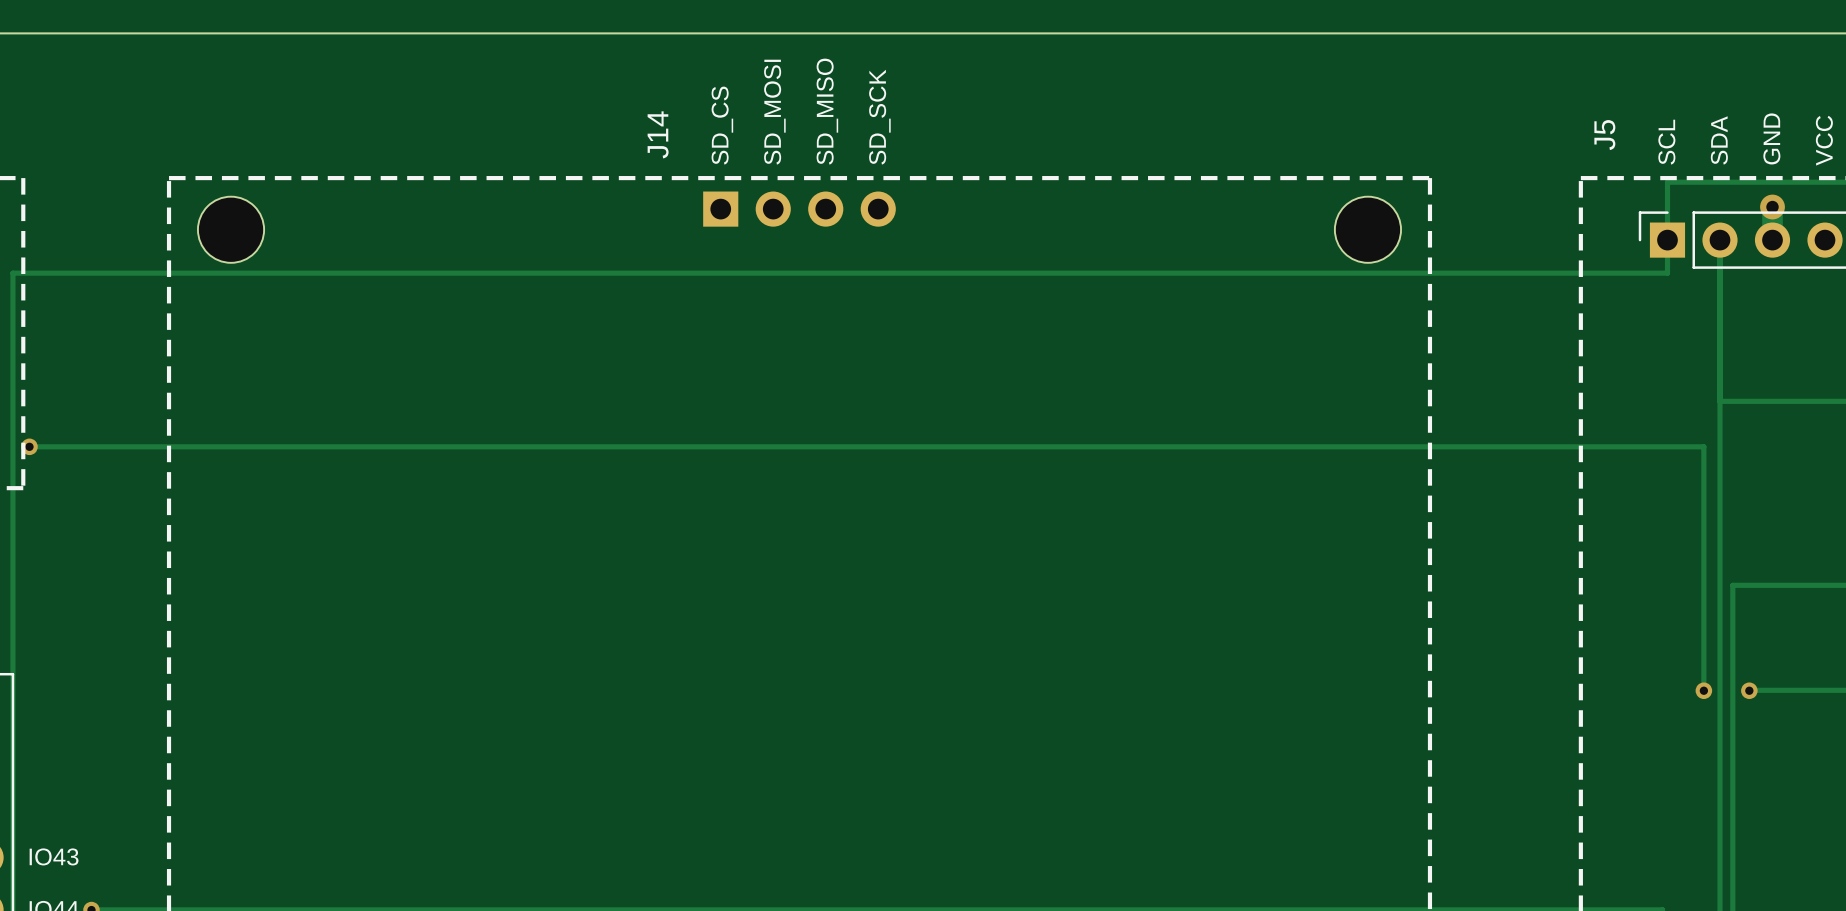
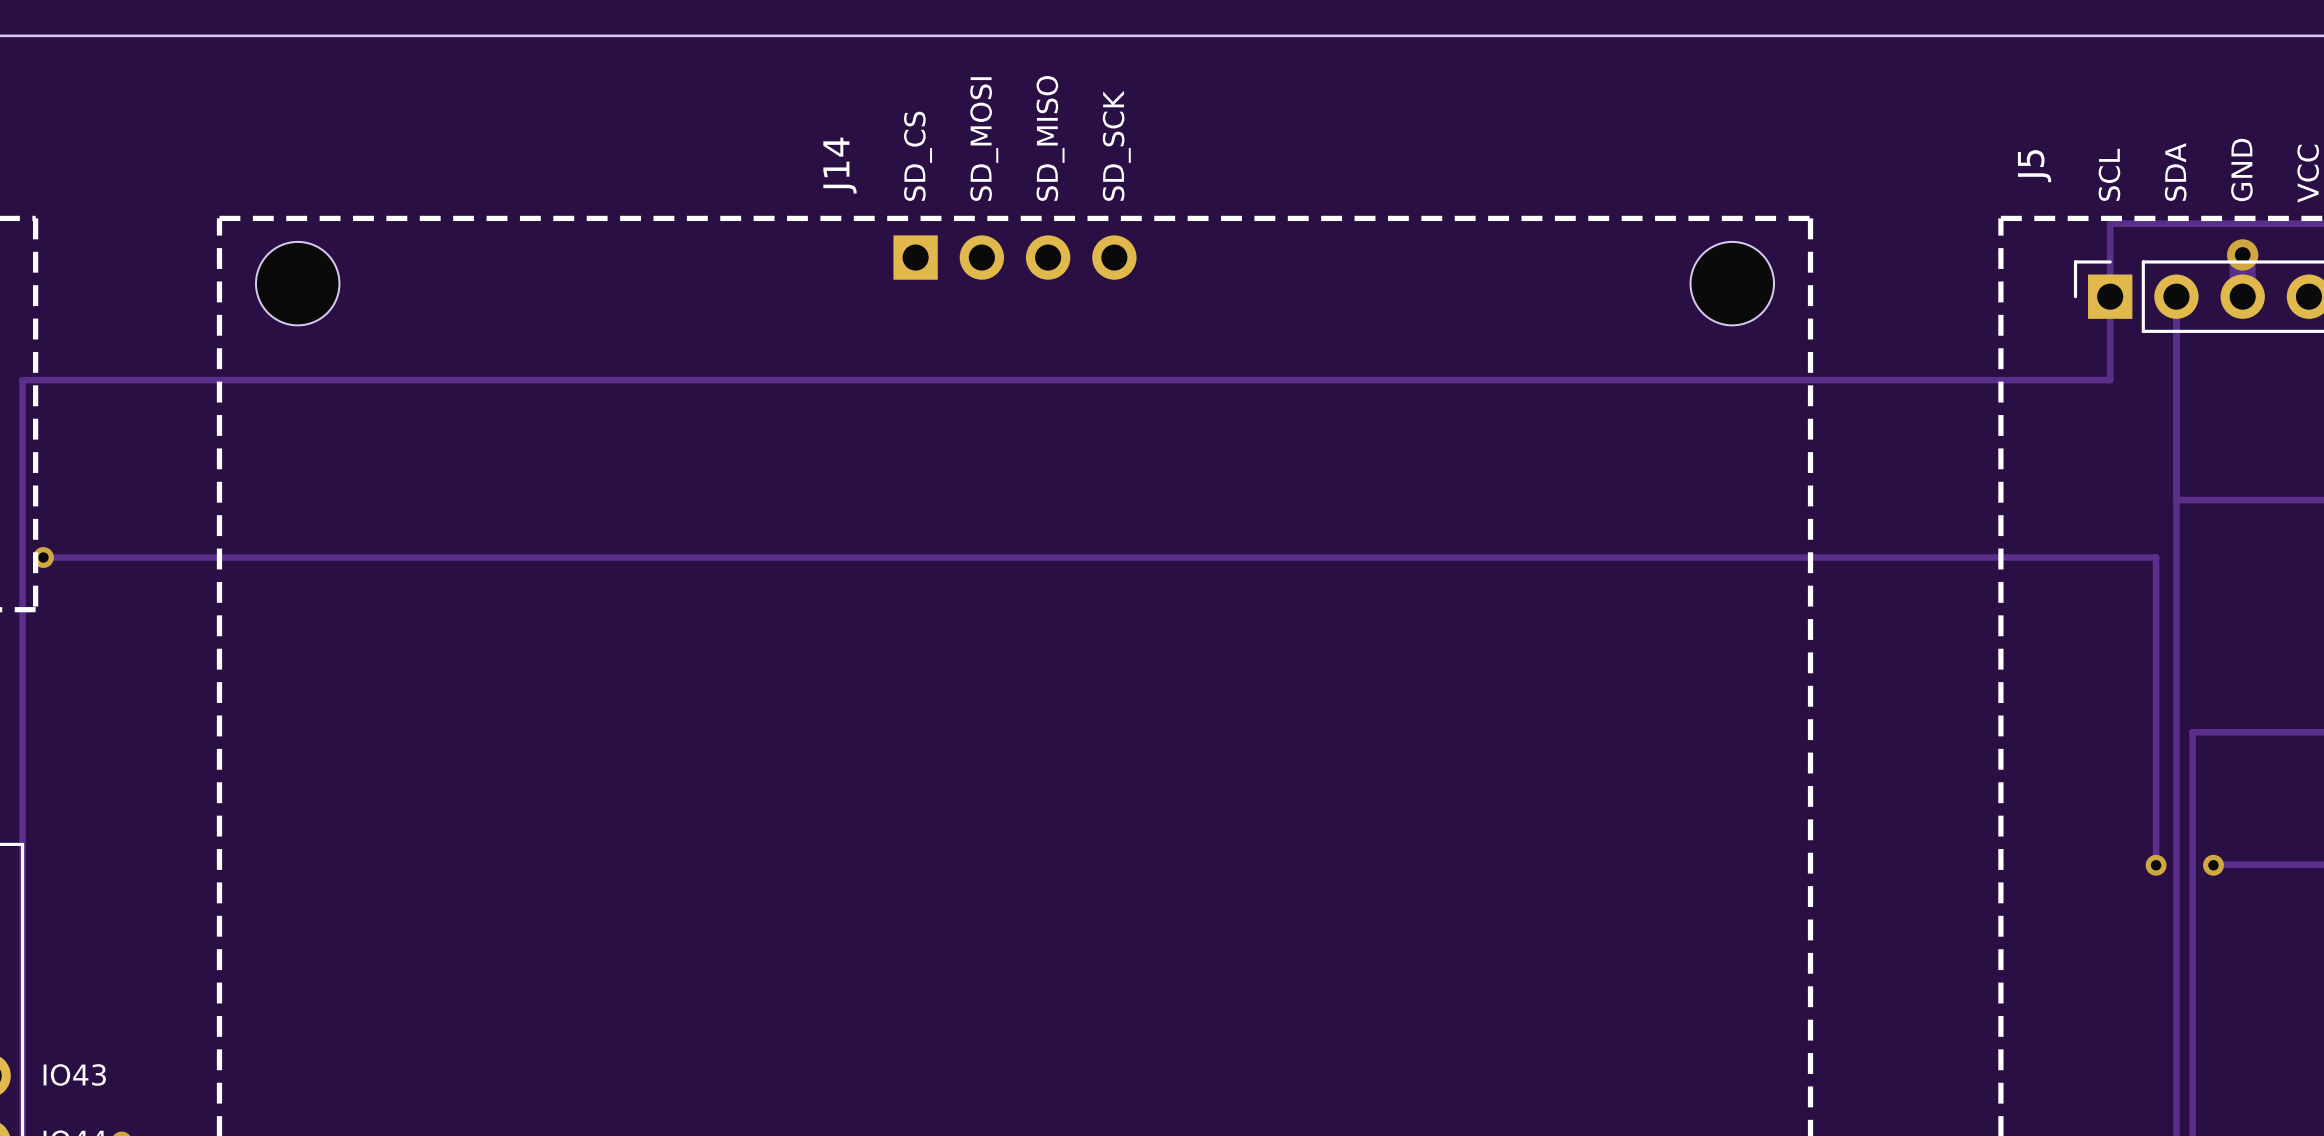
track: (1667, 273) (12, 273) (12, 306) -> (2110, 338) (2110, 380) (22, 380)

